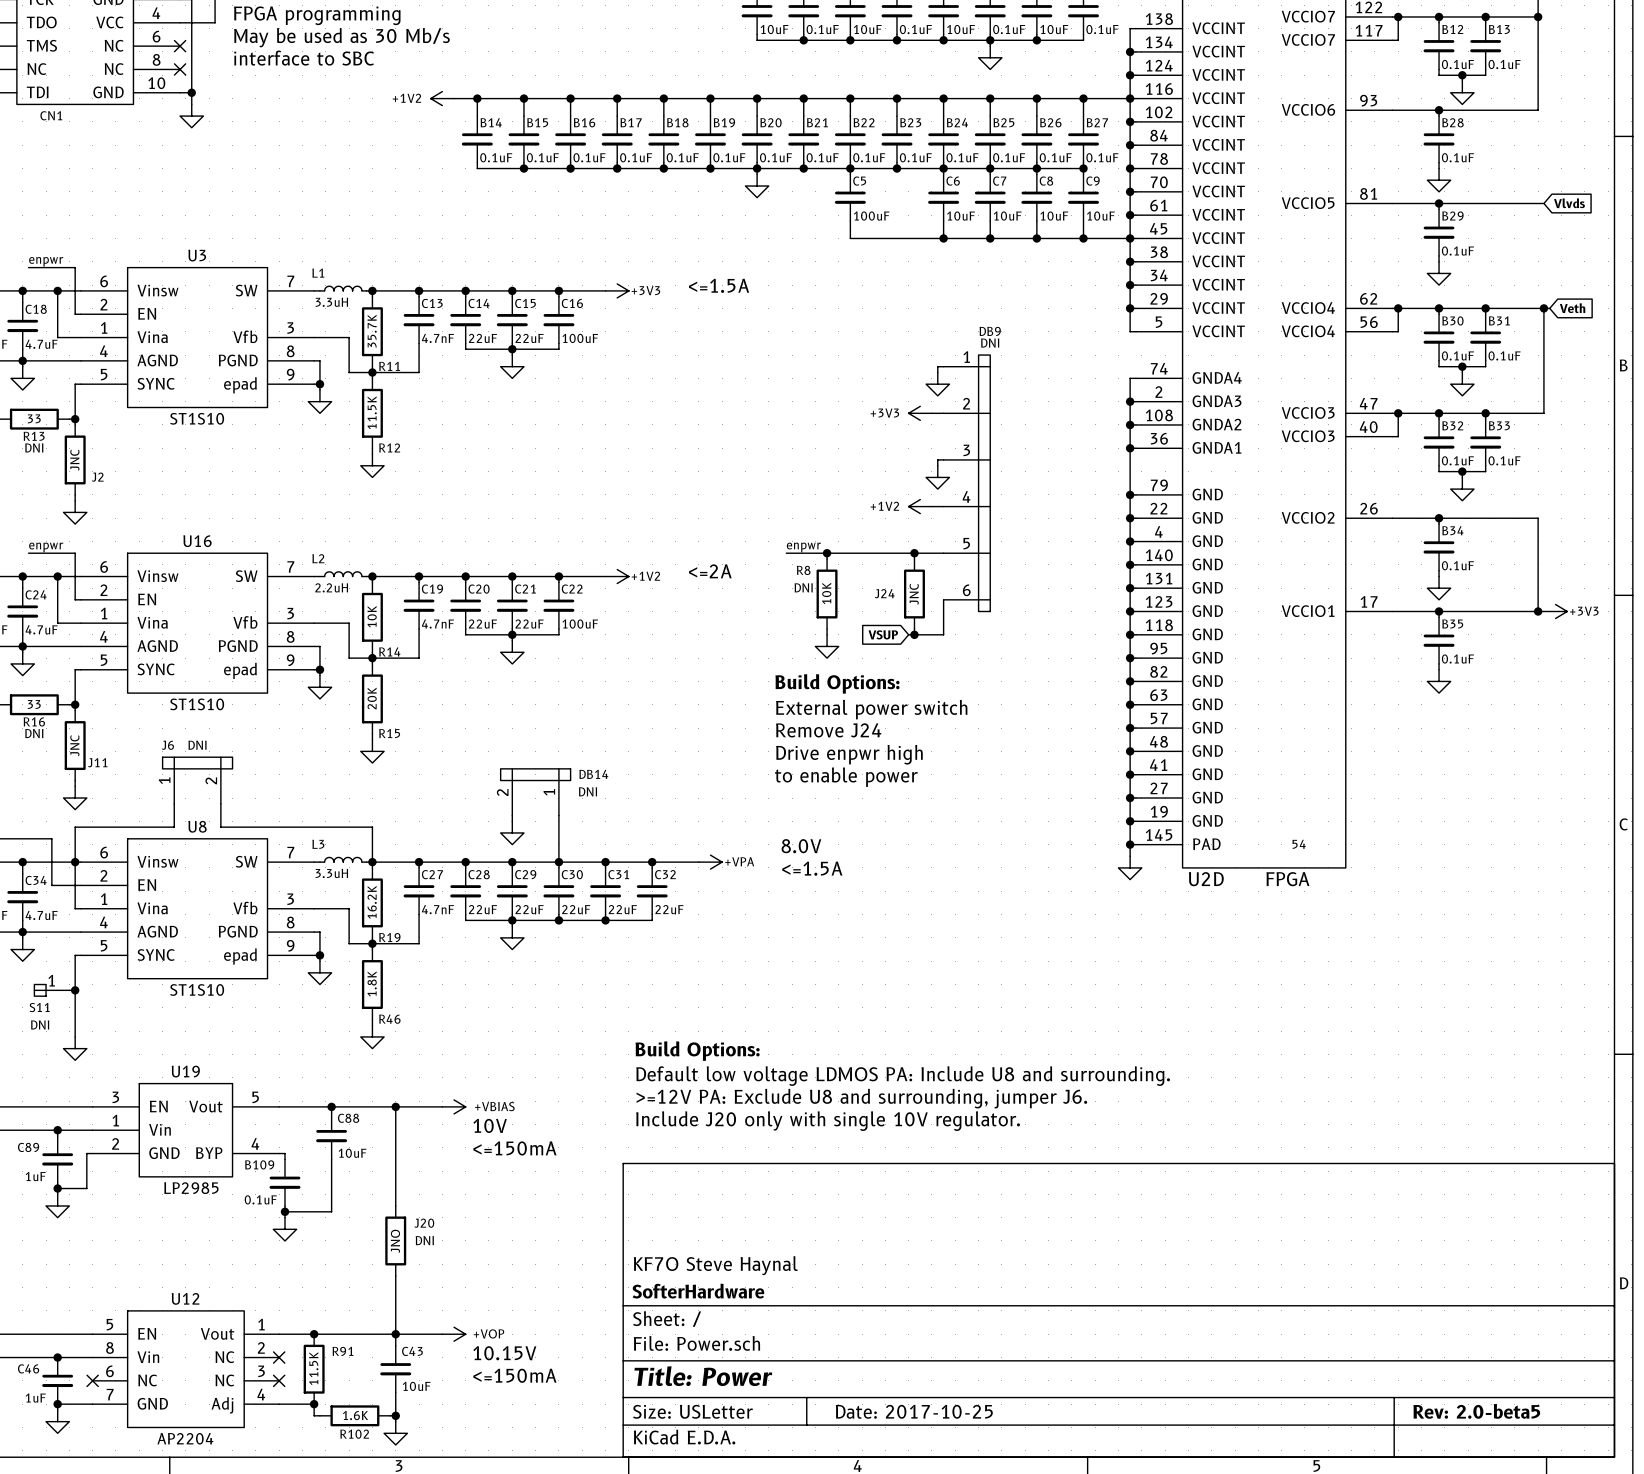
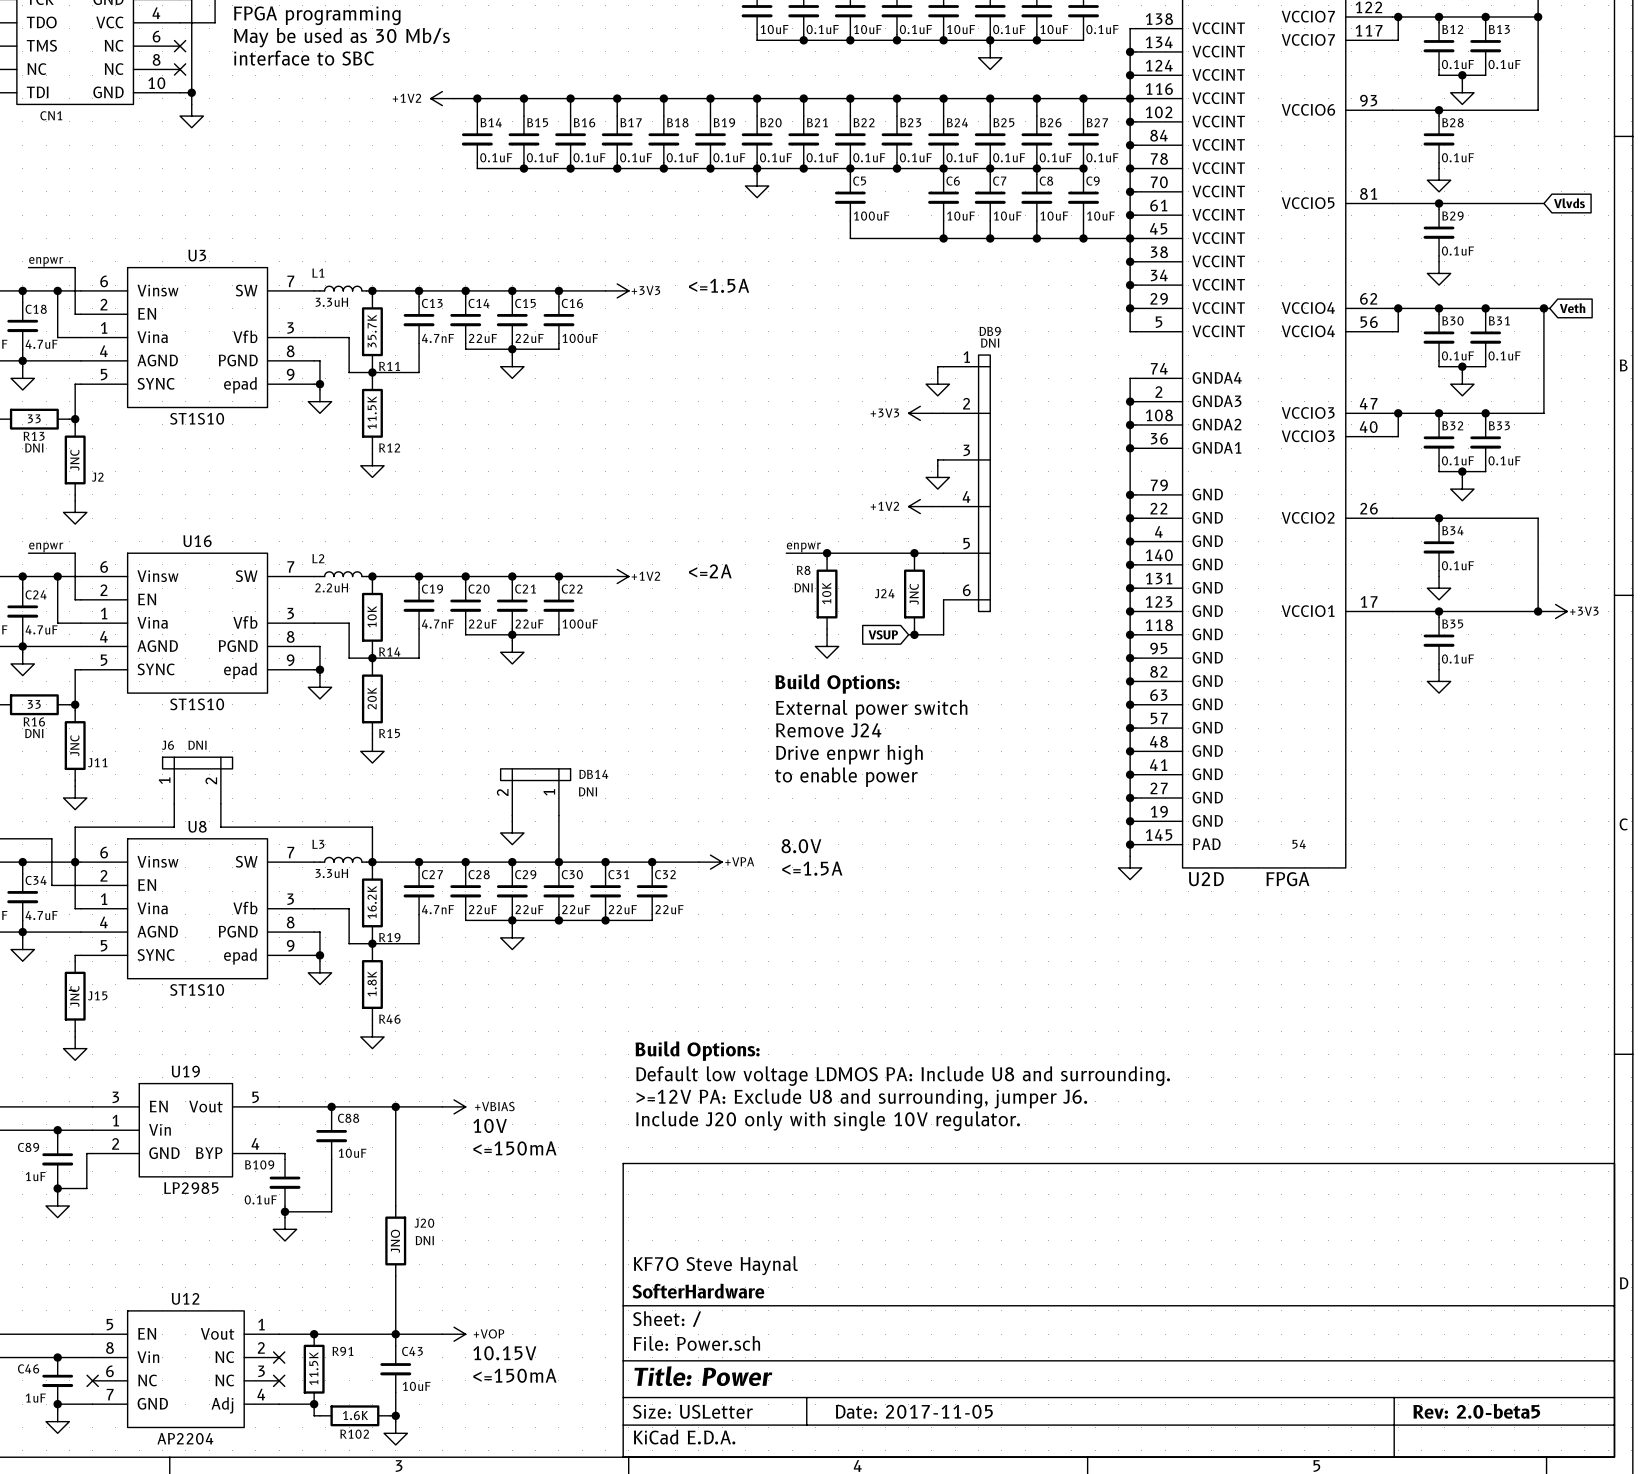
wire: (75, 961) (75, 1031) -> none
S11: (51, 990) -> none
junction: (75, 990) -> none
J15: none -> JNC (75, 996)
title block: Date: 2017-10-25 (914, 1411) -> Date: 2017-11-05 (914, 1411)

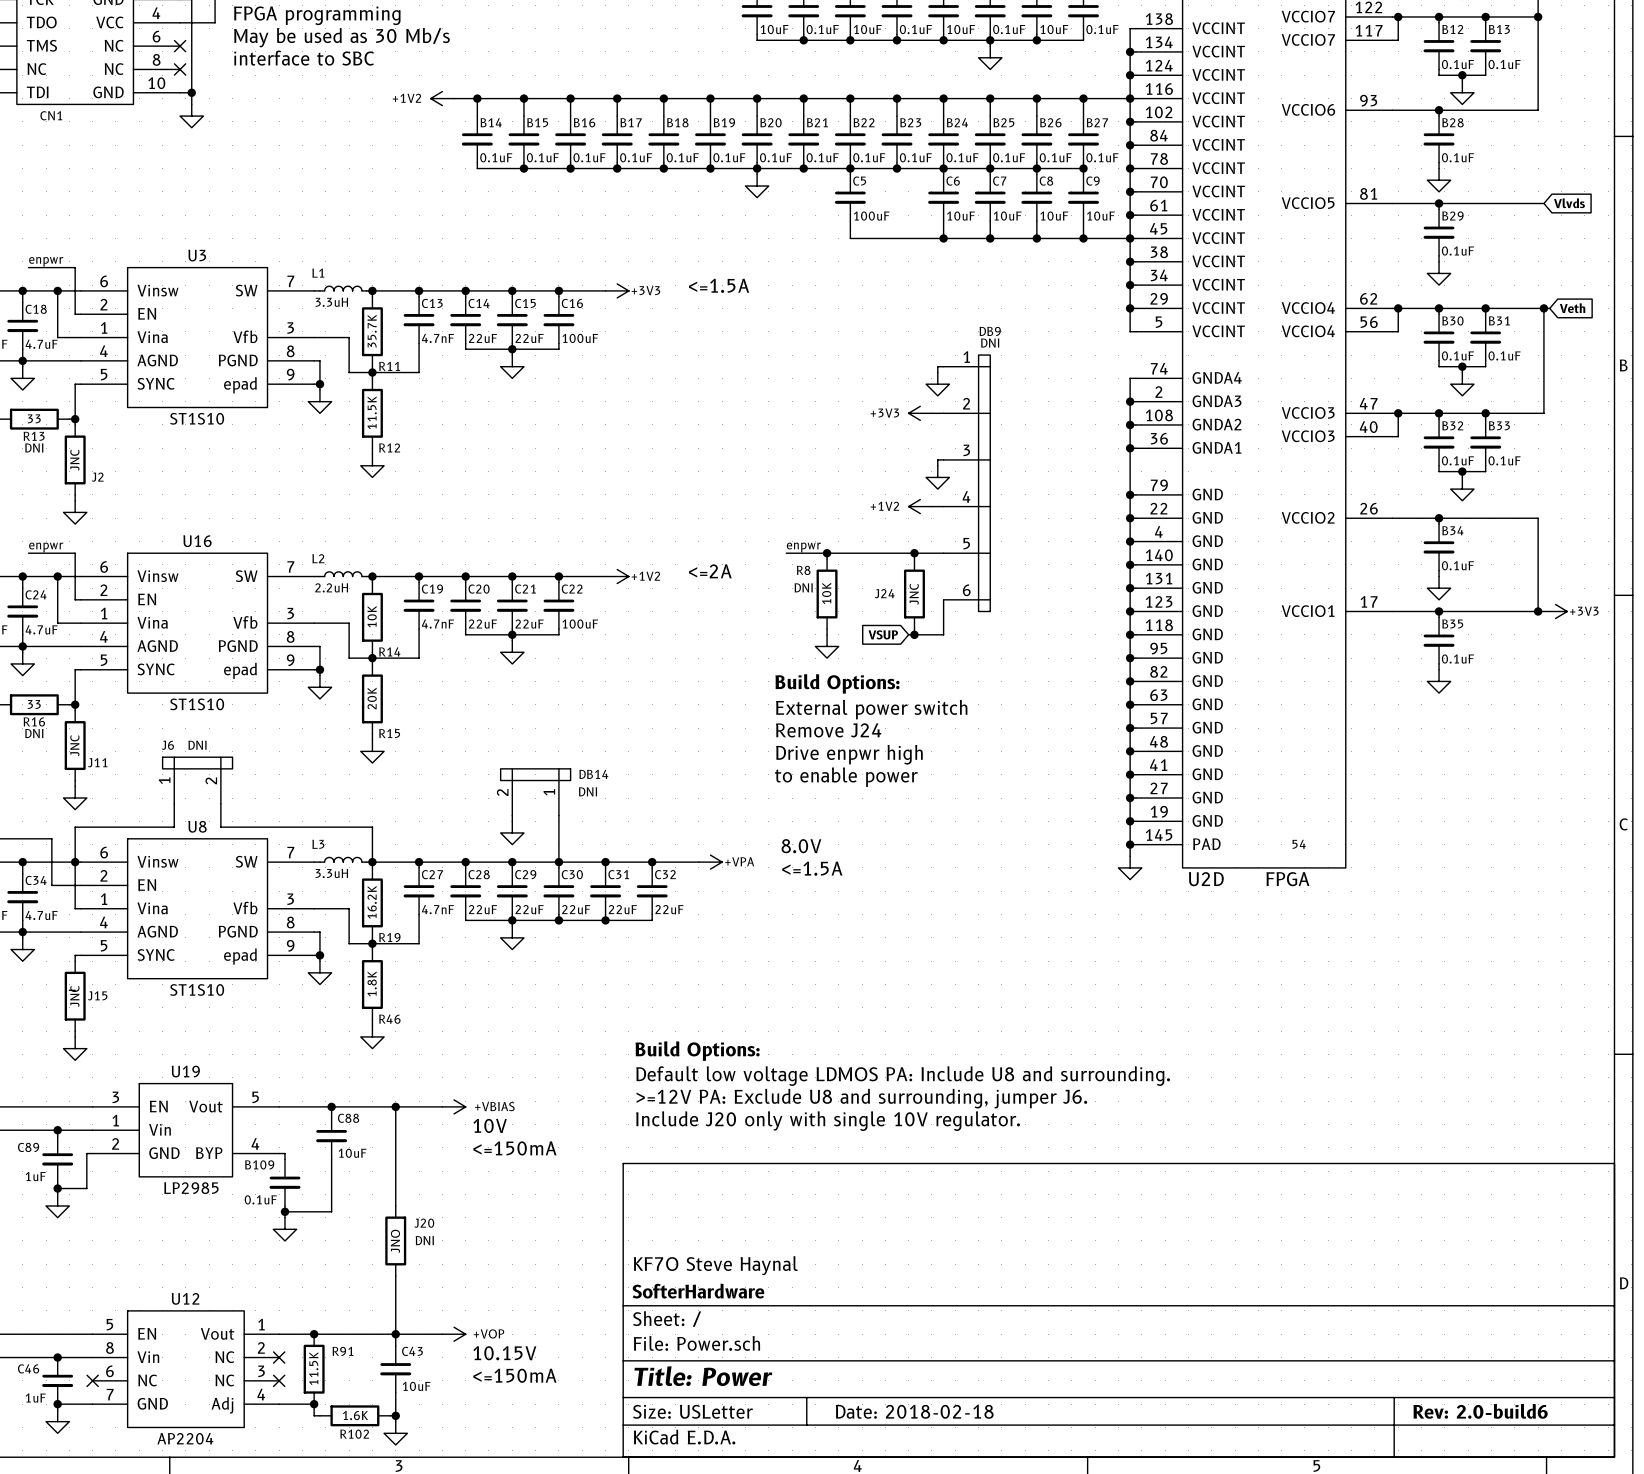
title block: Date: 2017-11-05 (914, 1411) -> Date: 2018-02-18 (914, 1411)
title block: Rev: 2.0-beta5 (1476, 1411) -> Rev: 2.0-build6 (1480, 1411)

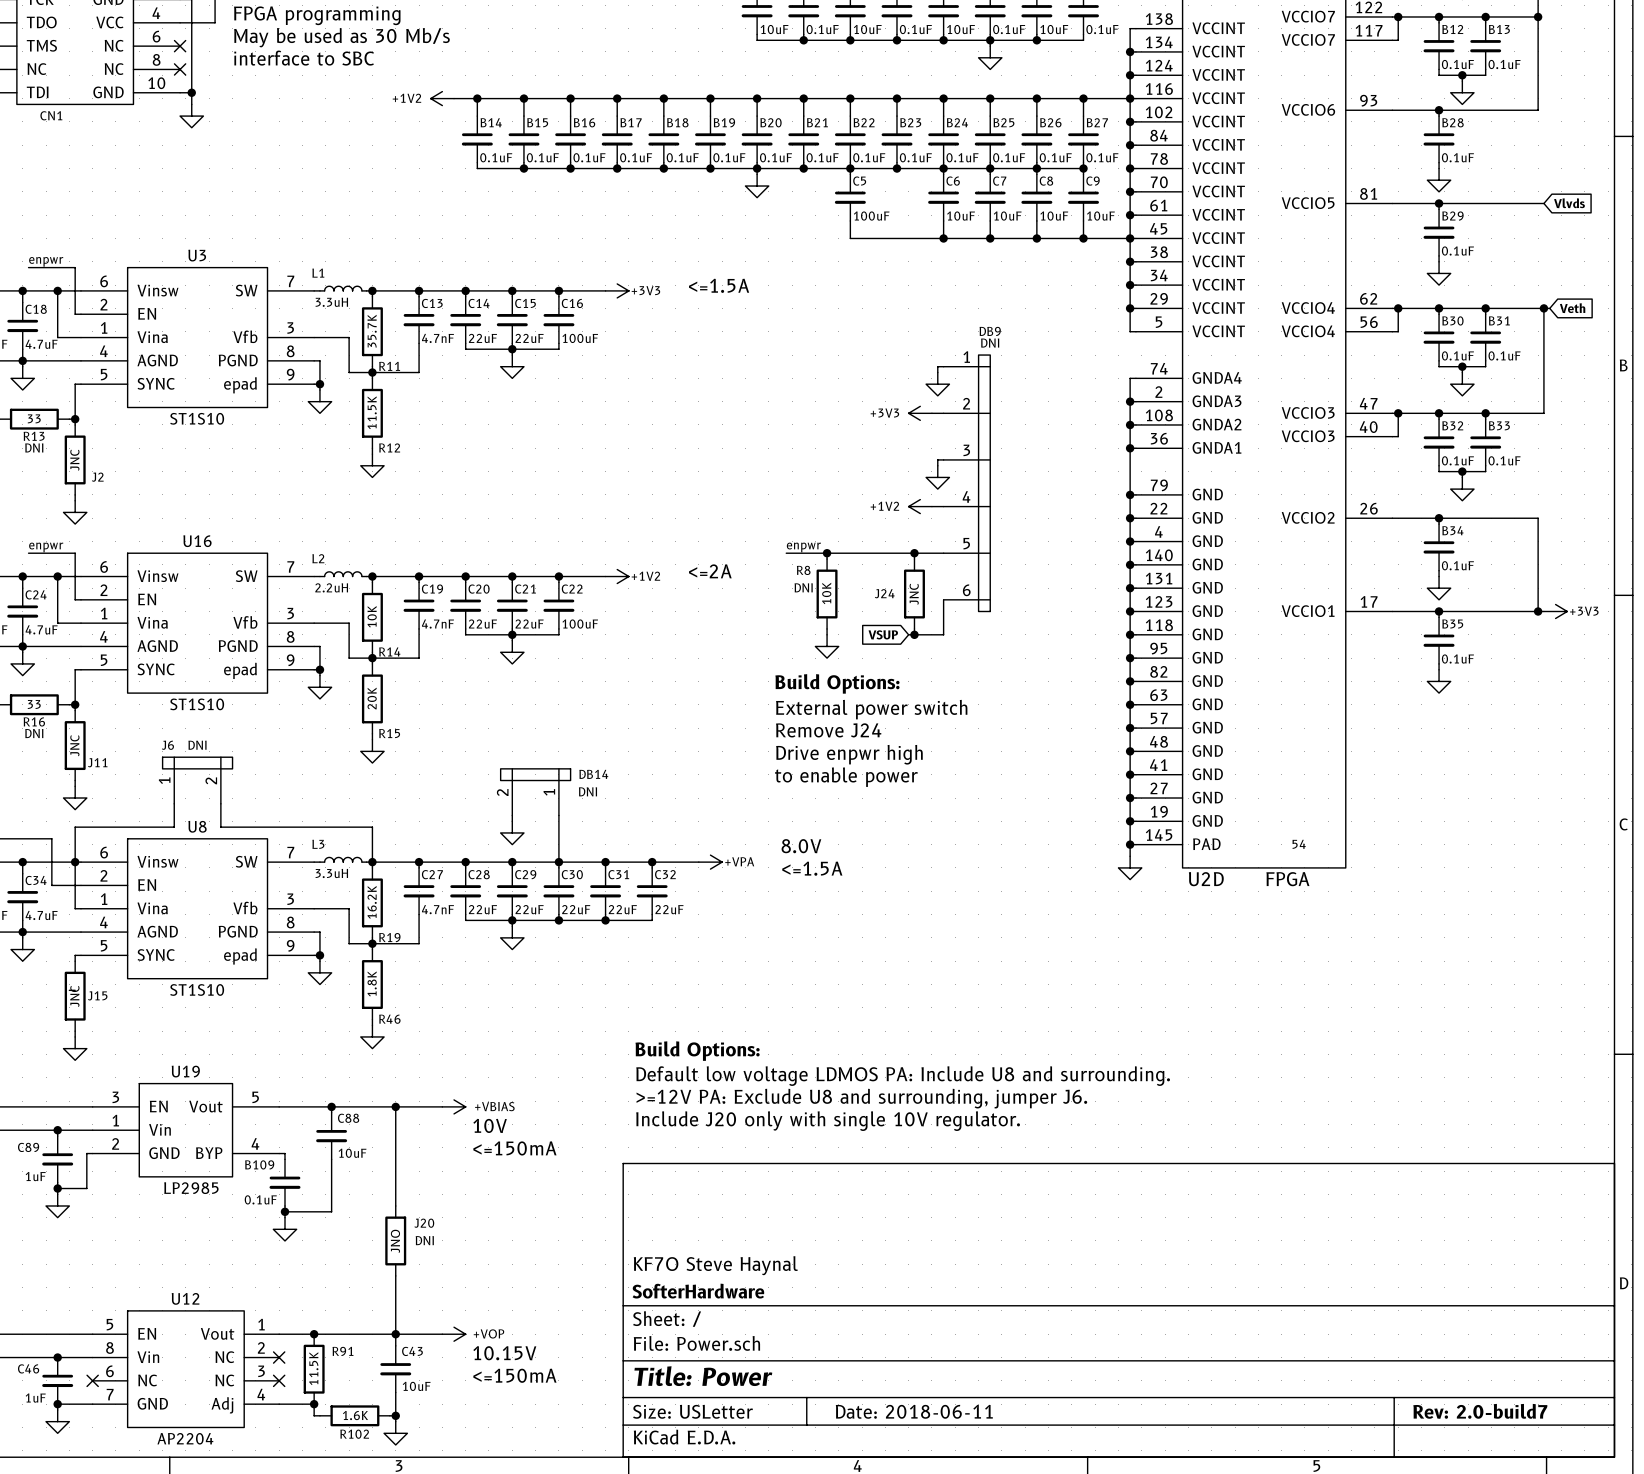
title block: Date: 2018-02-18 (914, 1411) -> Date: 2018-06-11 (914, 1411)
title block: Rev: 2.0-build6 (1480, 1411) -> Rev: 2.0-build7 (1480, 1411)

